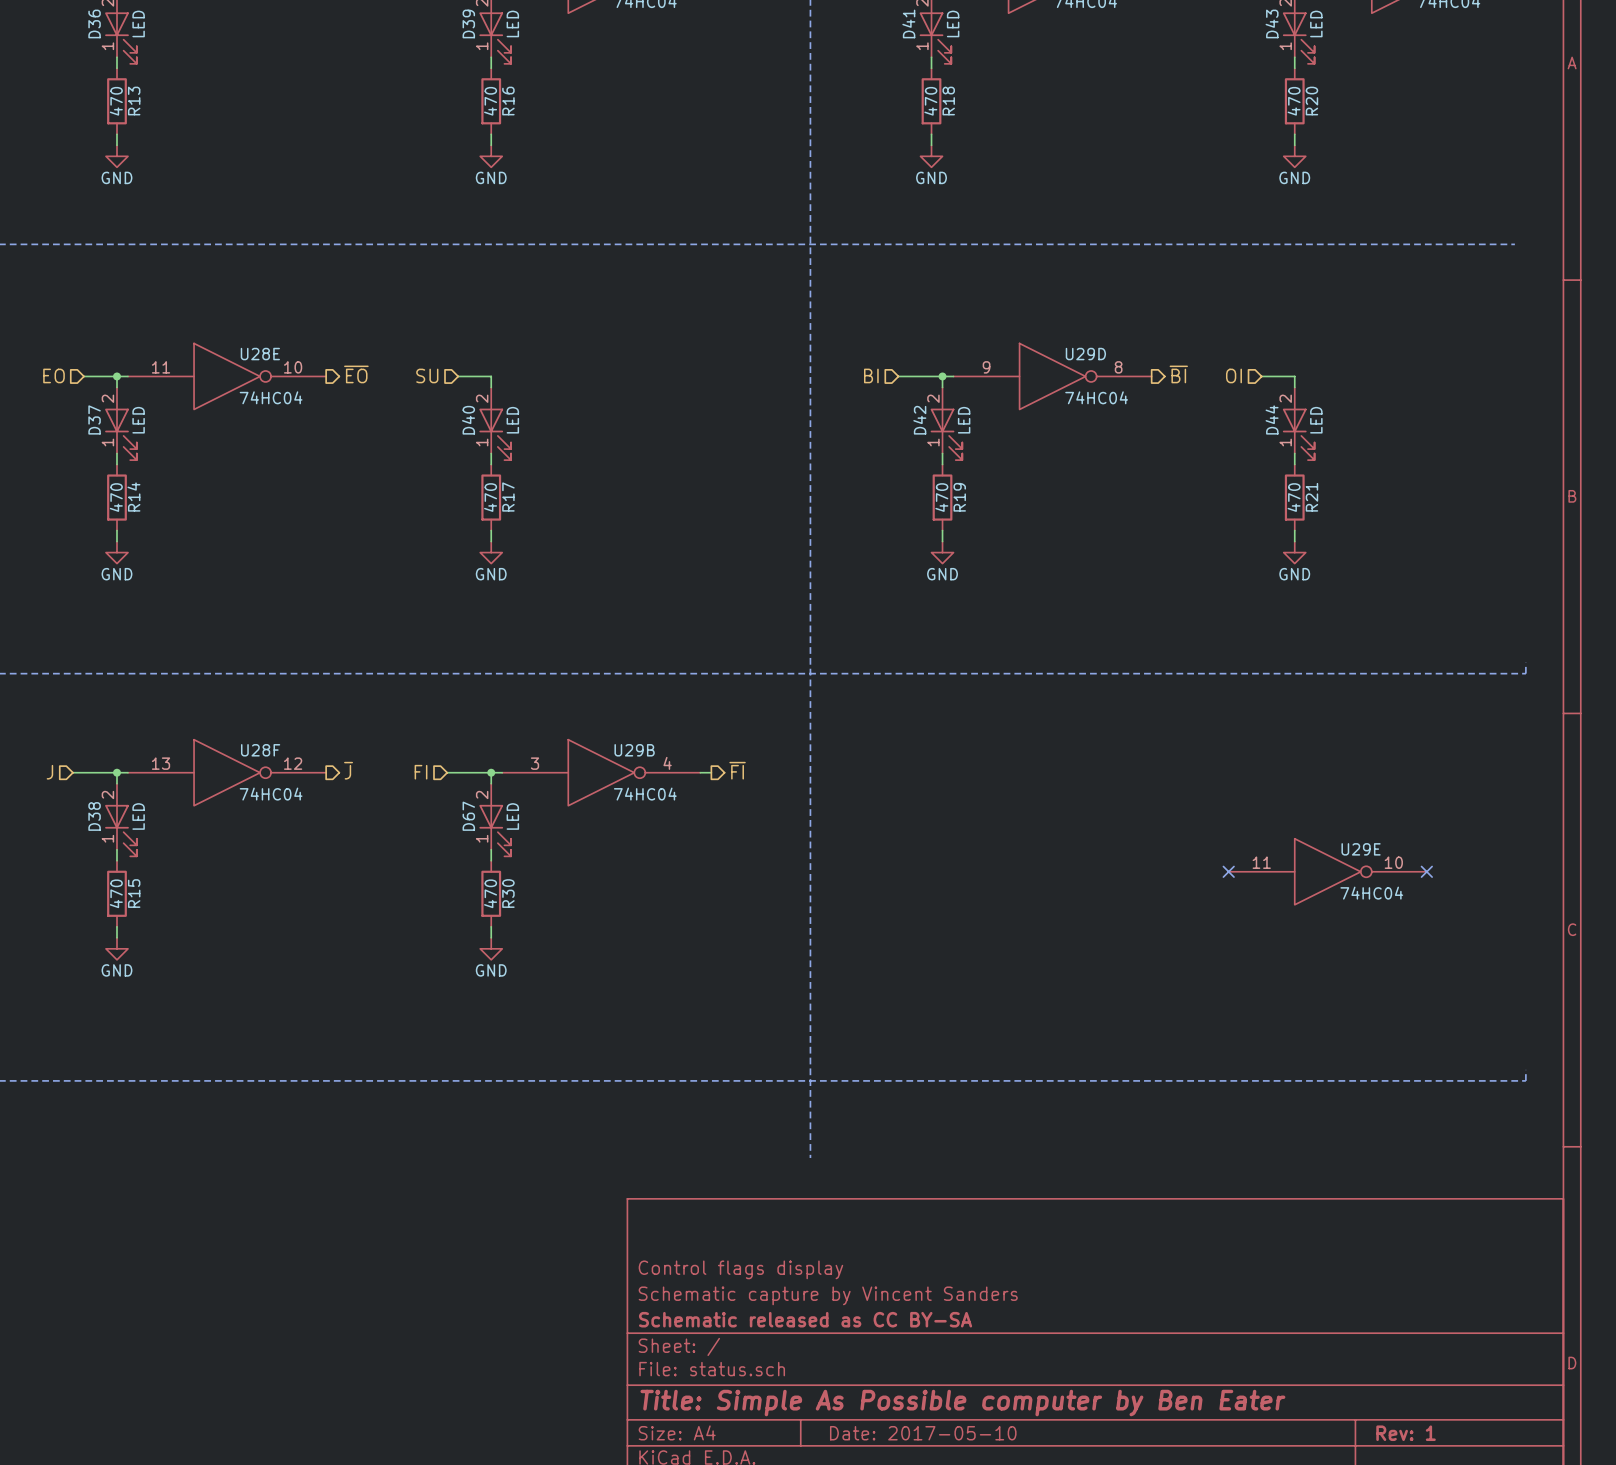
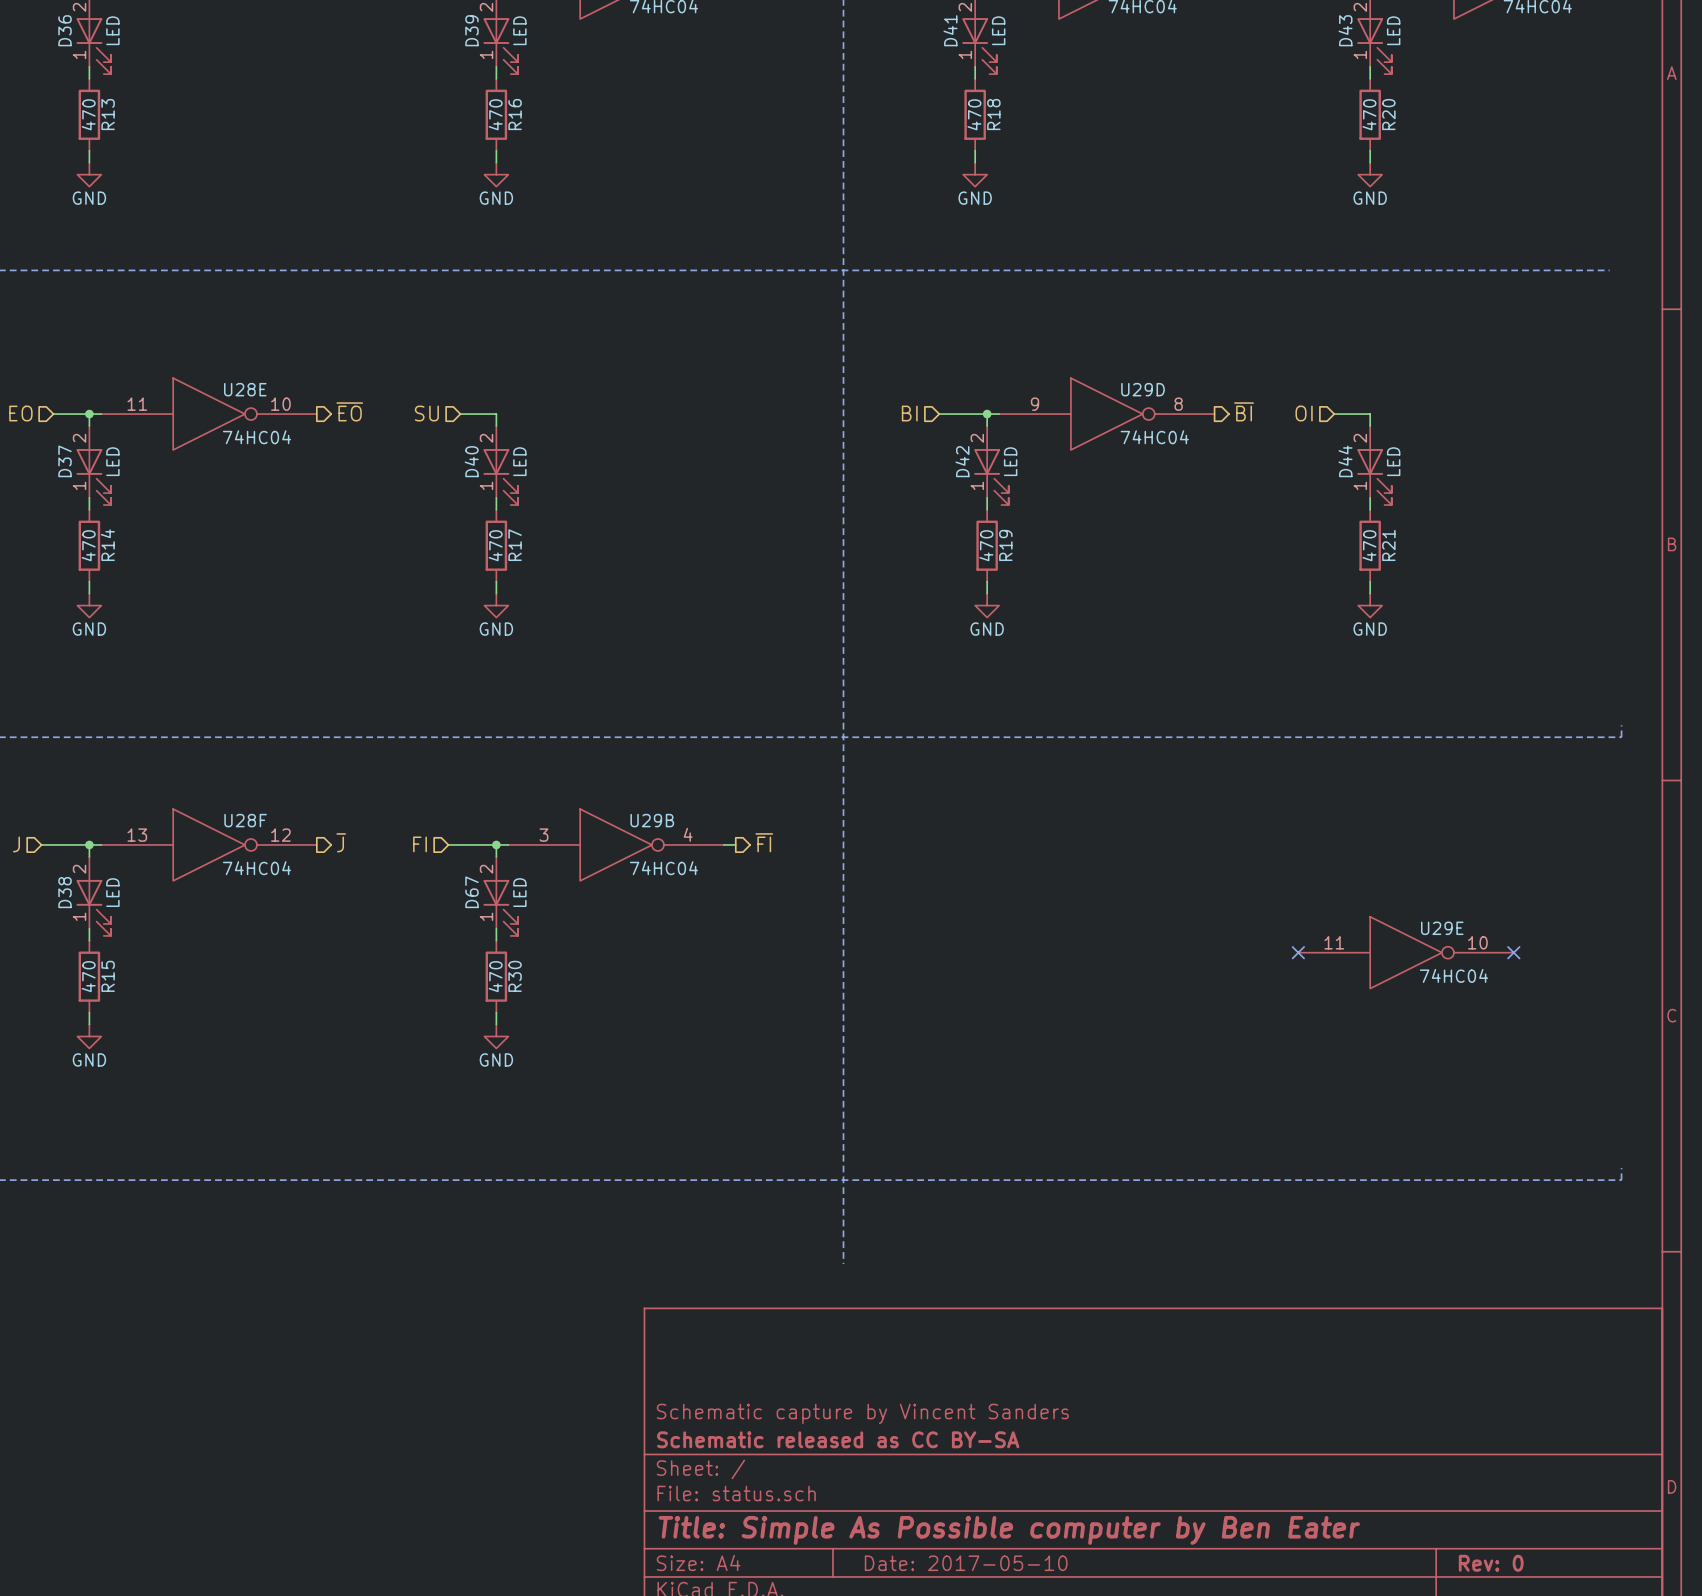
title block: Control flags display (740, 1269) -> none
title block: Rev: 1 (1406, 1433) -> Rev: 0 (1491, 1563)

